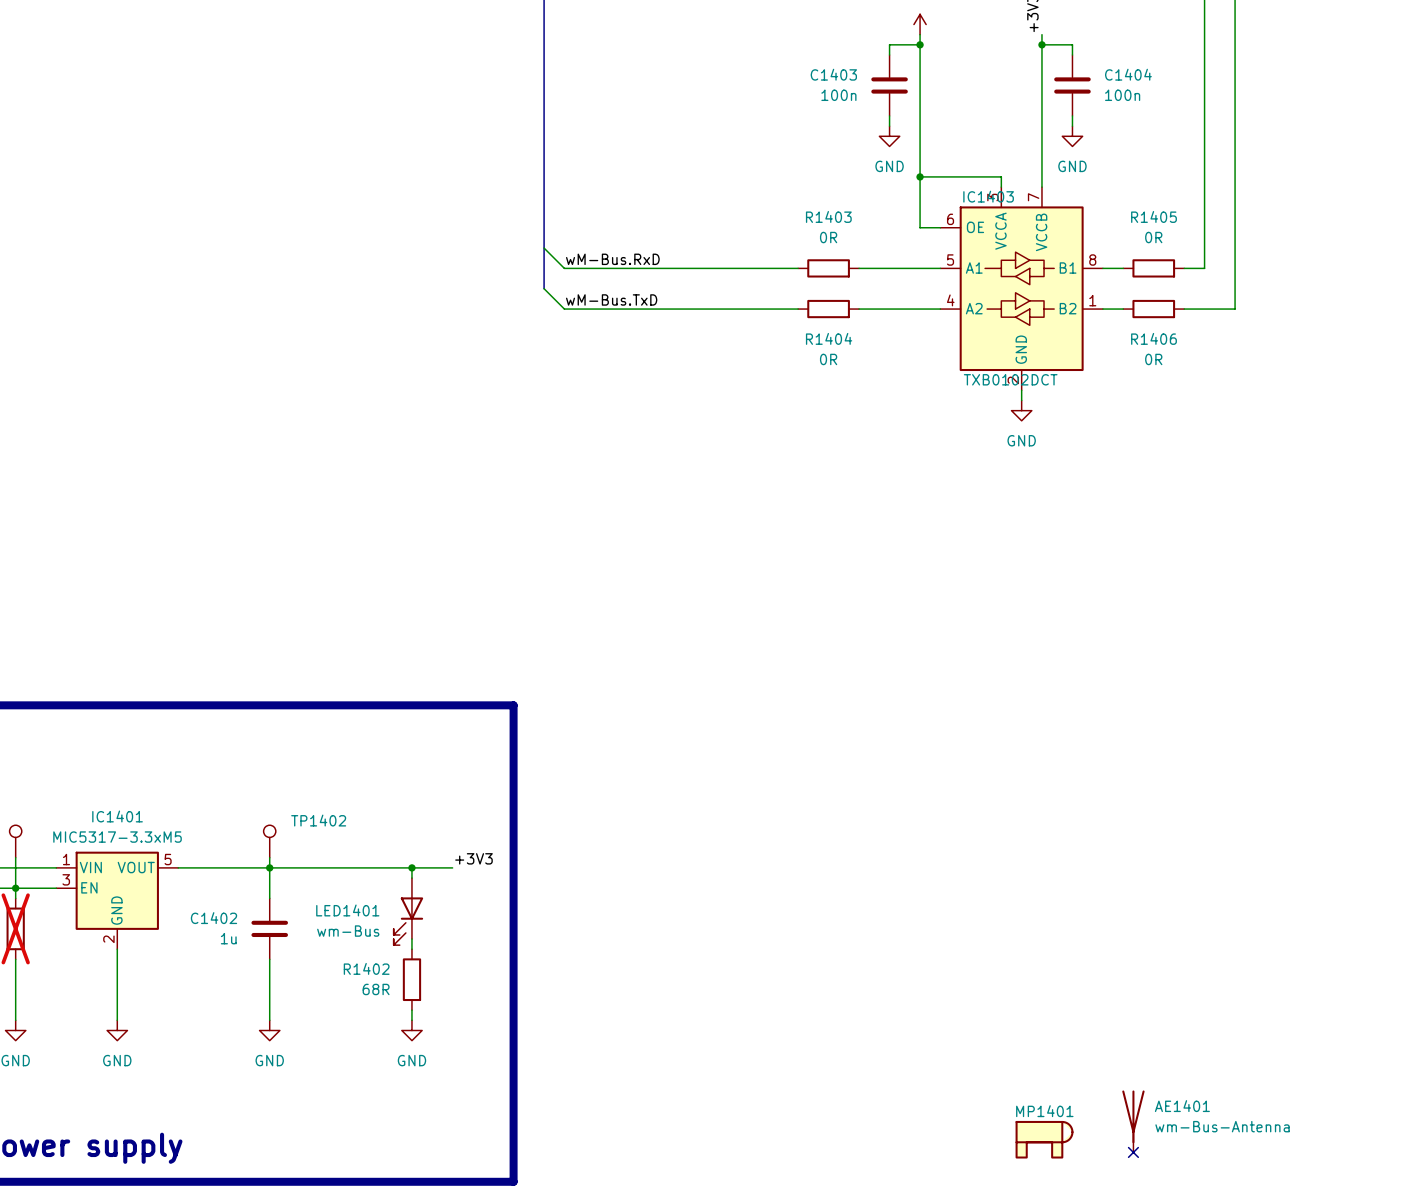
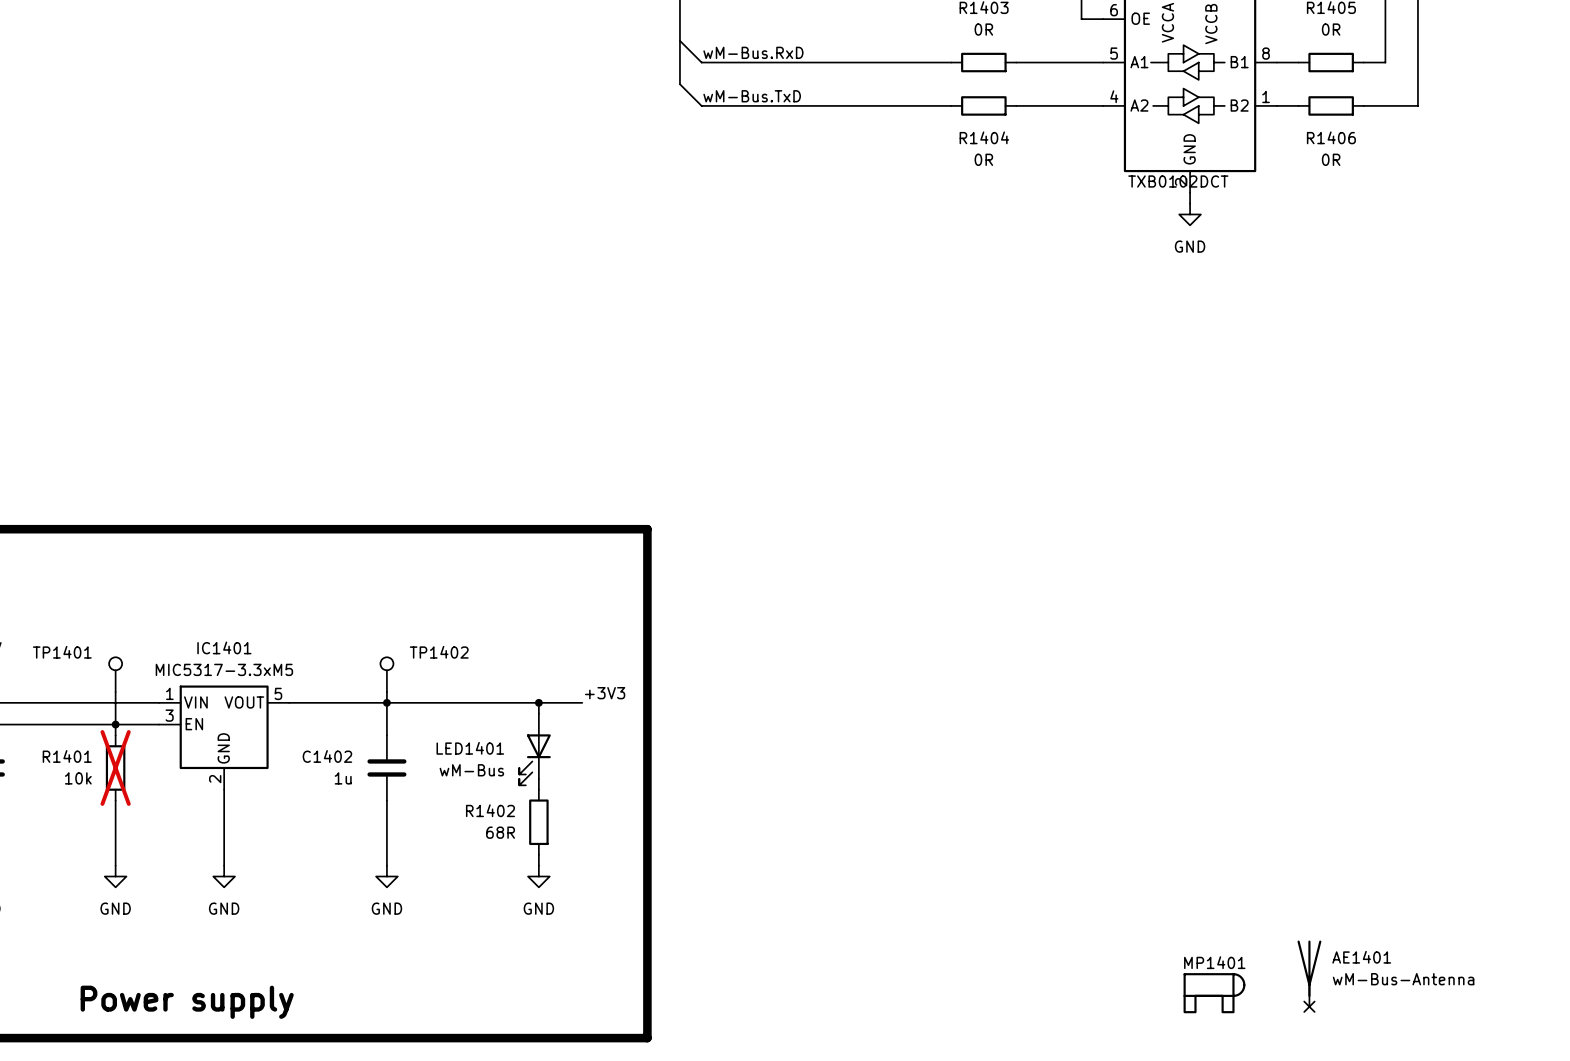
LED1401 value: wm-Bus (348, 931) -> wM-Bus (471, 770)
AE1401 value: wm-Bus-Antenna (1222, 1126) -> wM-Bus-Antenna (1403, 979)

